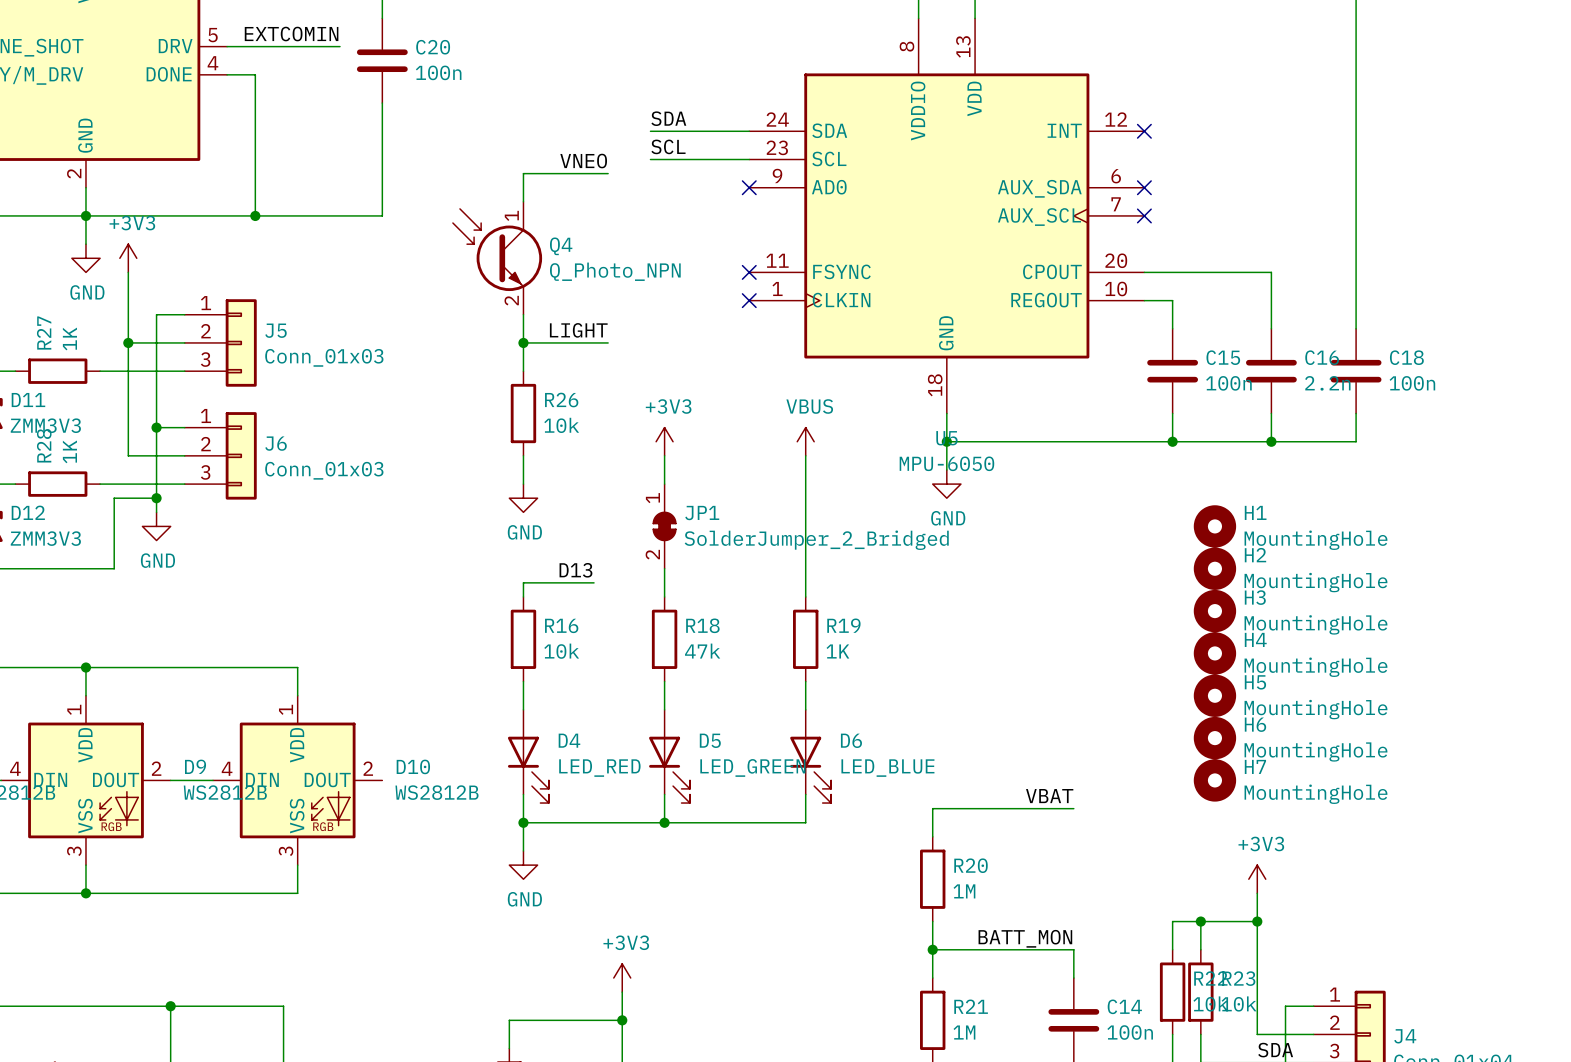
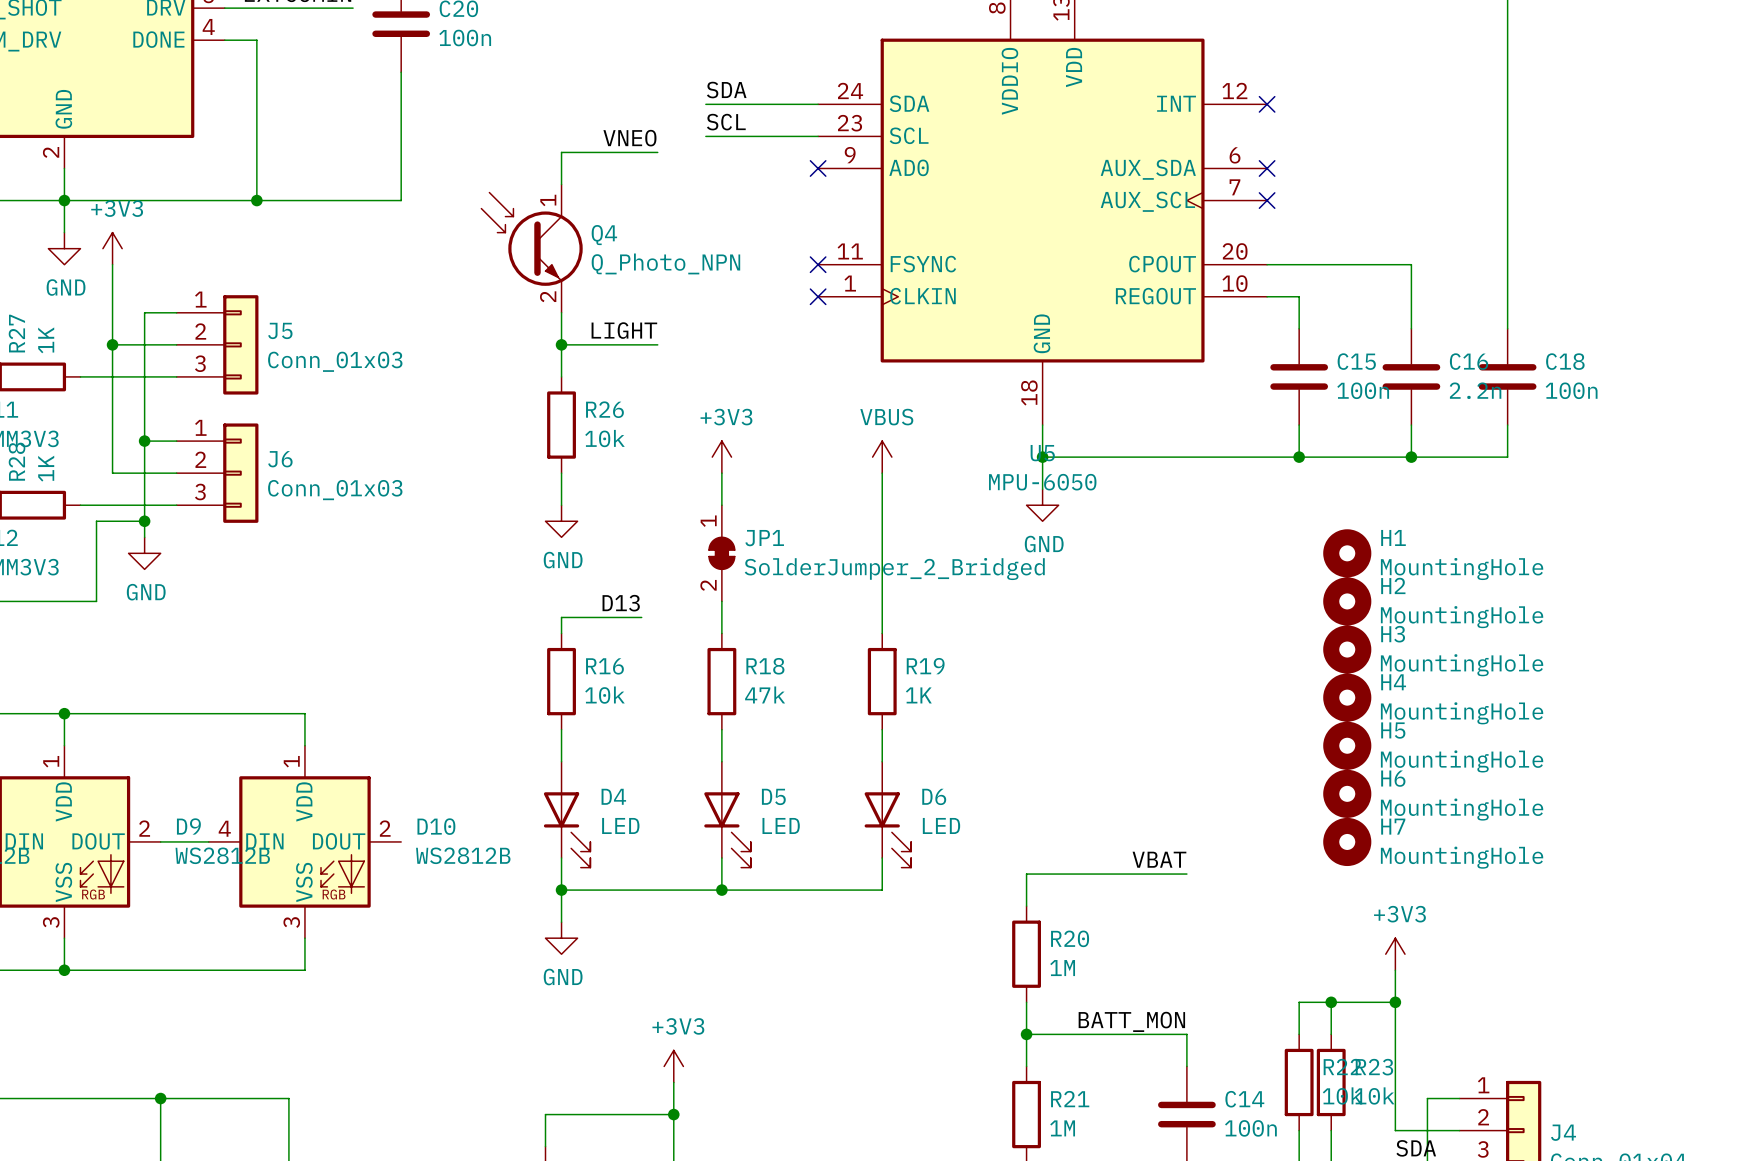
D5 value: LED_GREEN (752, 767) -> LED (781, 825)
D4 value: LED_RED (599, 768) -> LED (620, 825)
D6 value: LED_BLUE (887, 768) -> LED (941, 825)

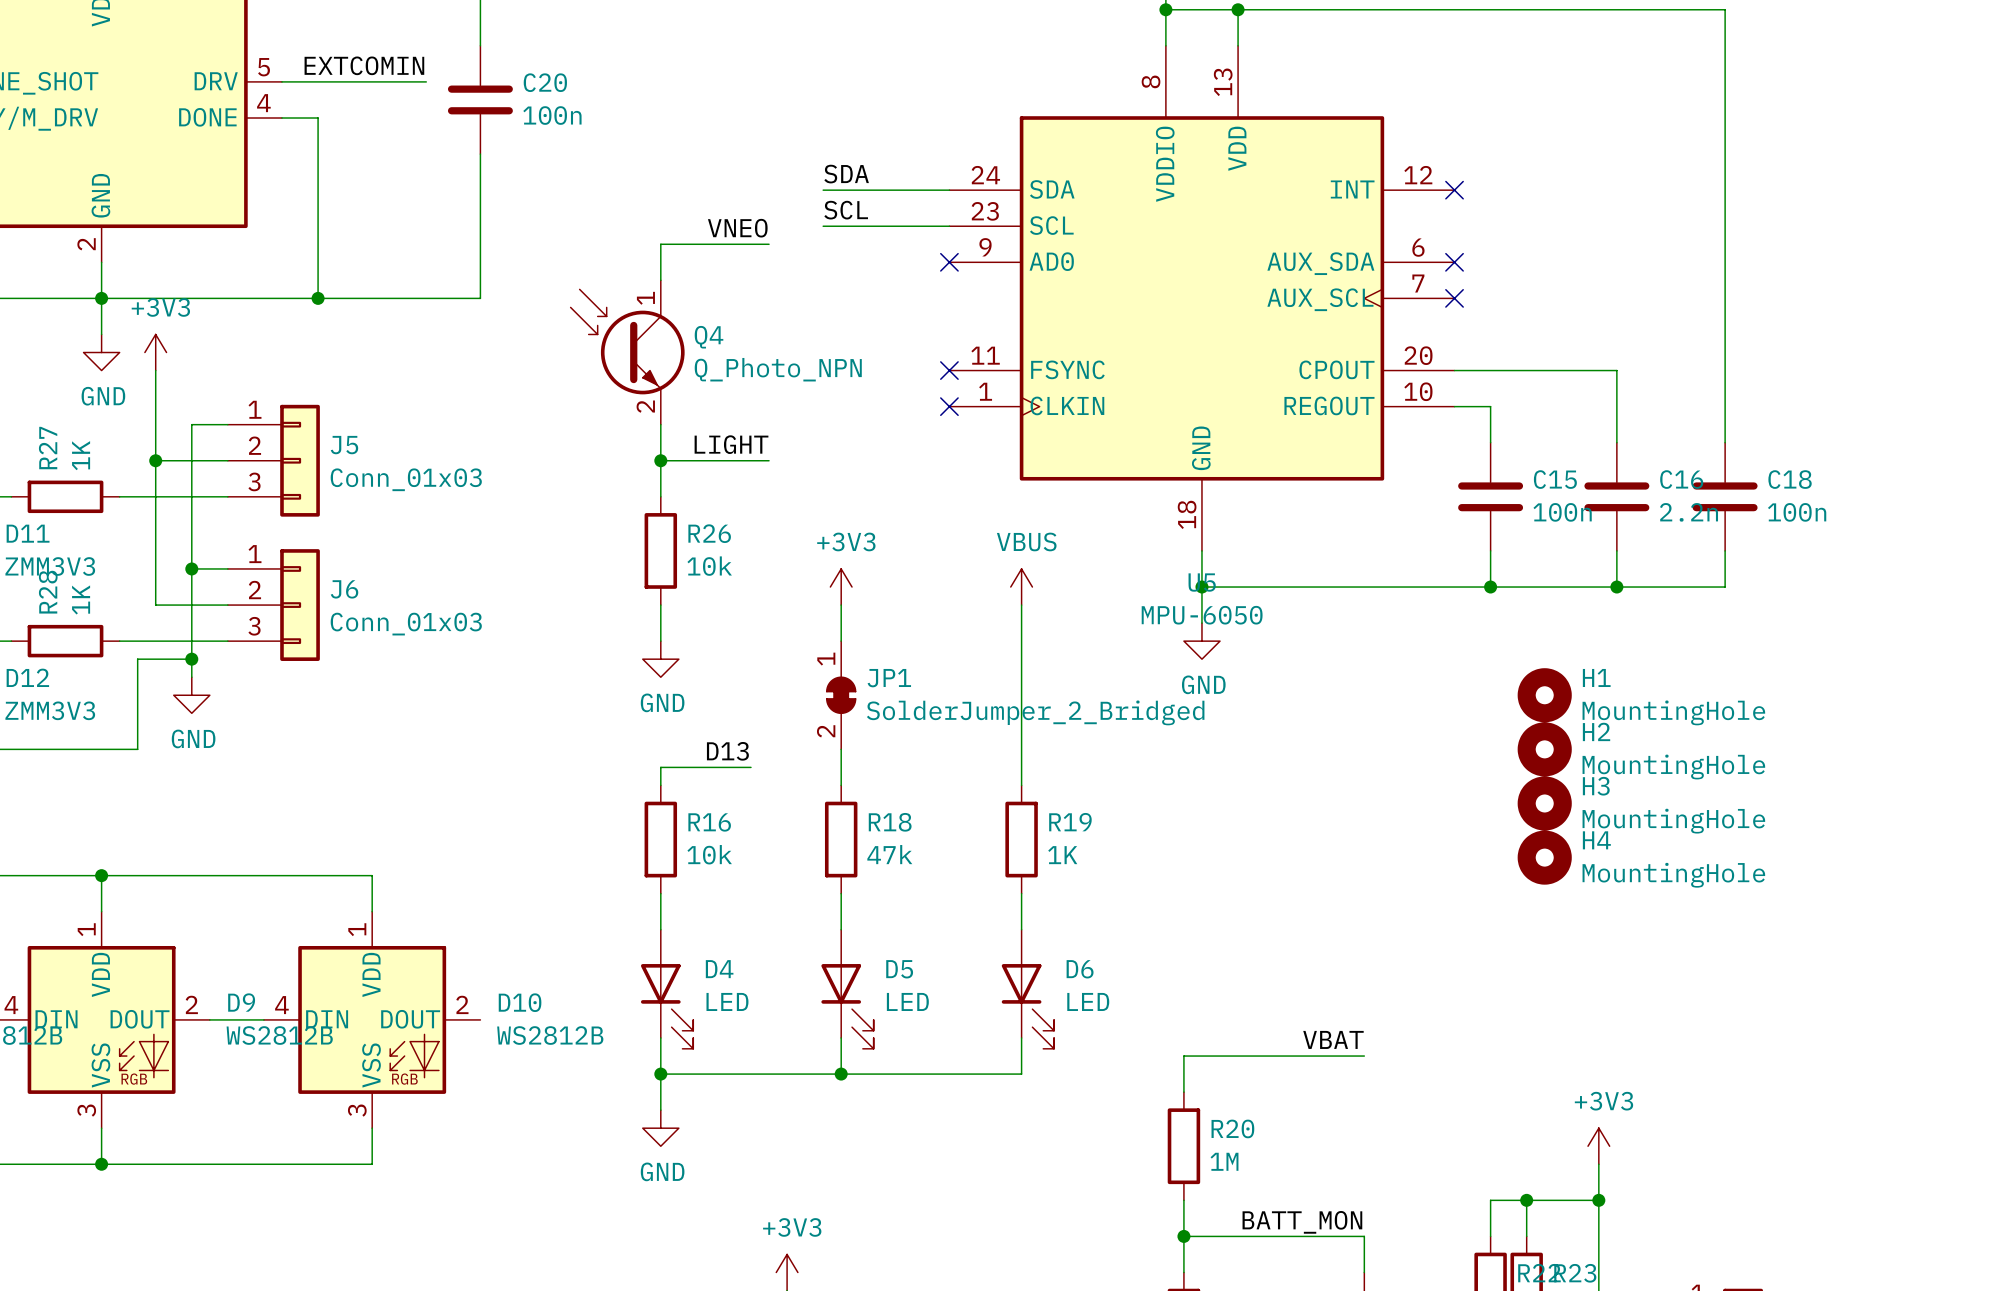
H5: MountingHole (1347, 745) -> none
H6: MountingHole (1347, 793) -> none
H7: MountingHole (1347, 841) -> none

